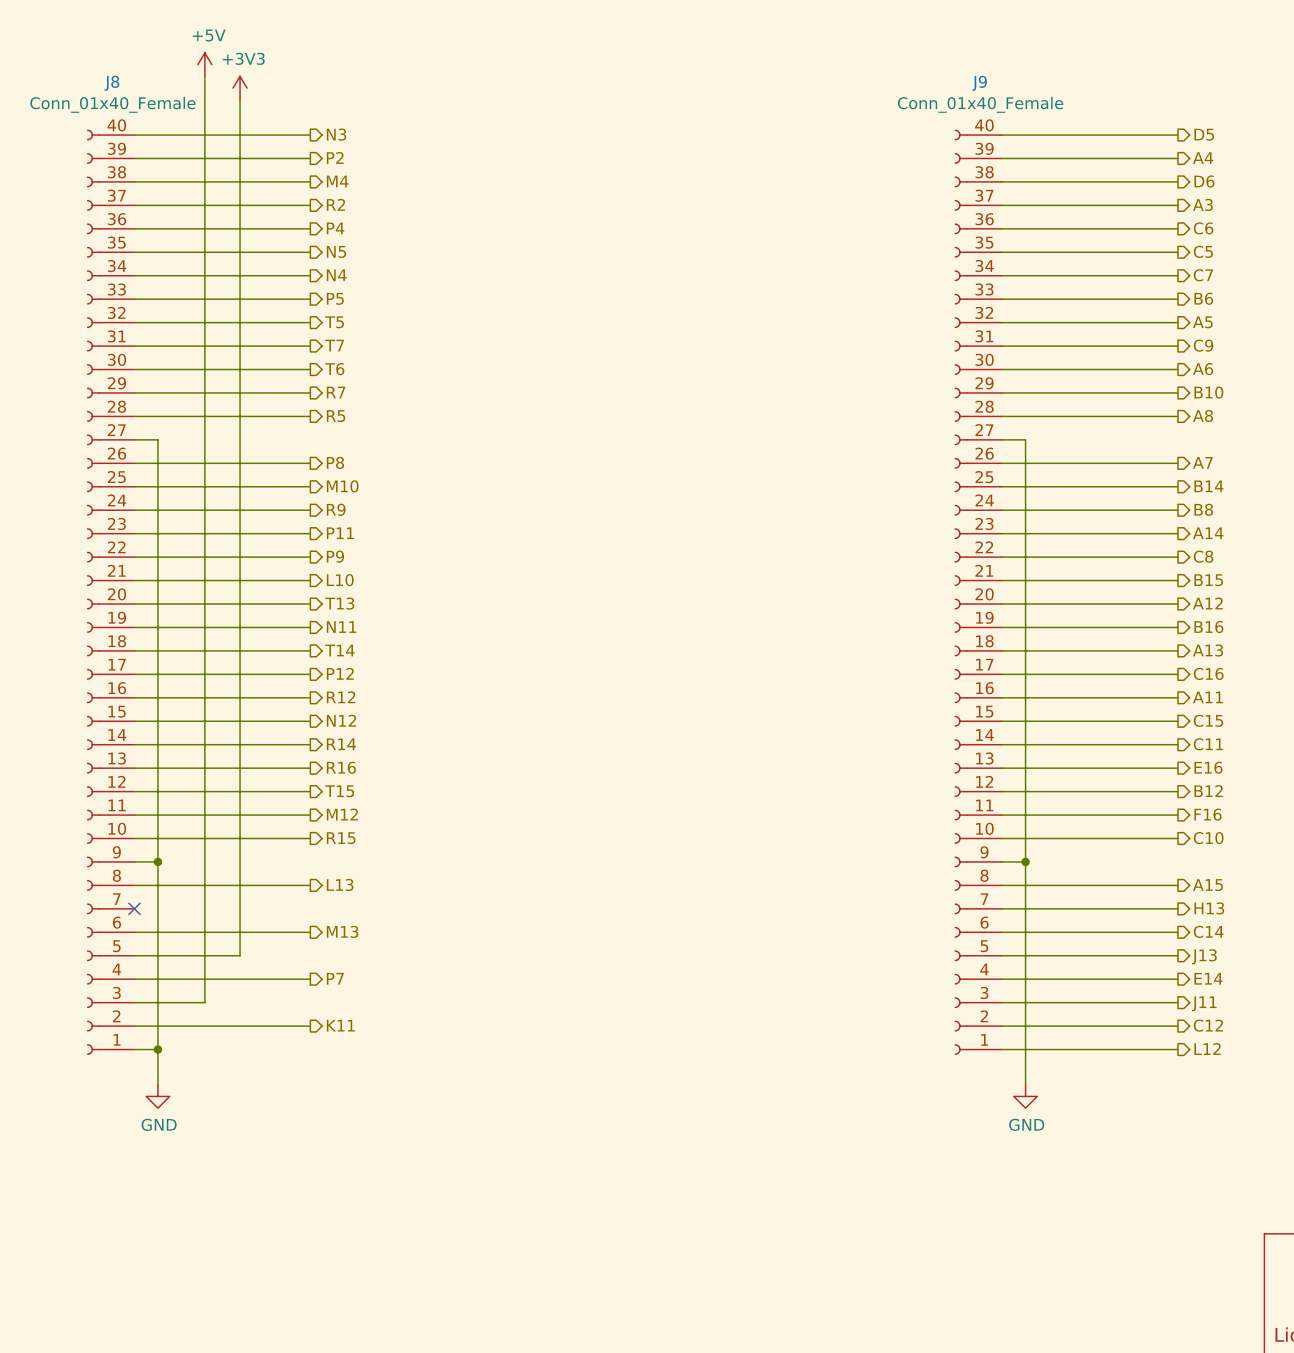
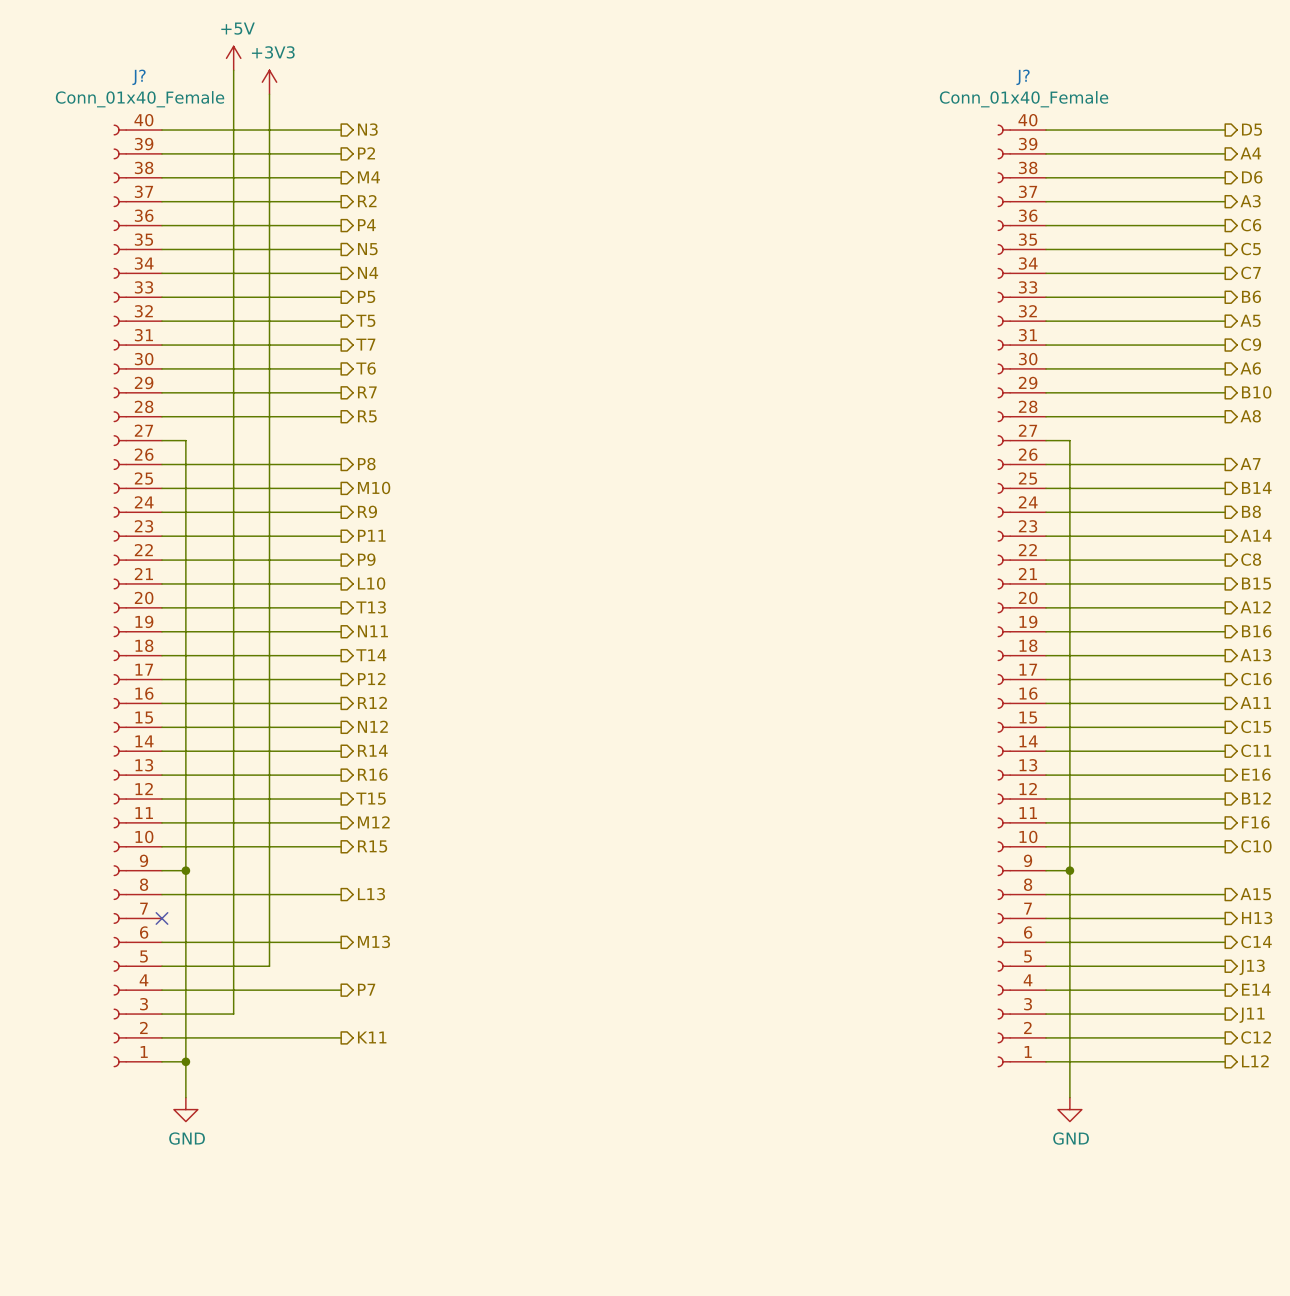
J8 name: J8 (111, 83) -> J? (139, 77)
J9 name: J9 (979, 83) -> J? (1023, 77)

